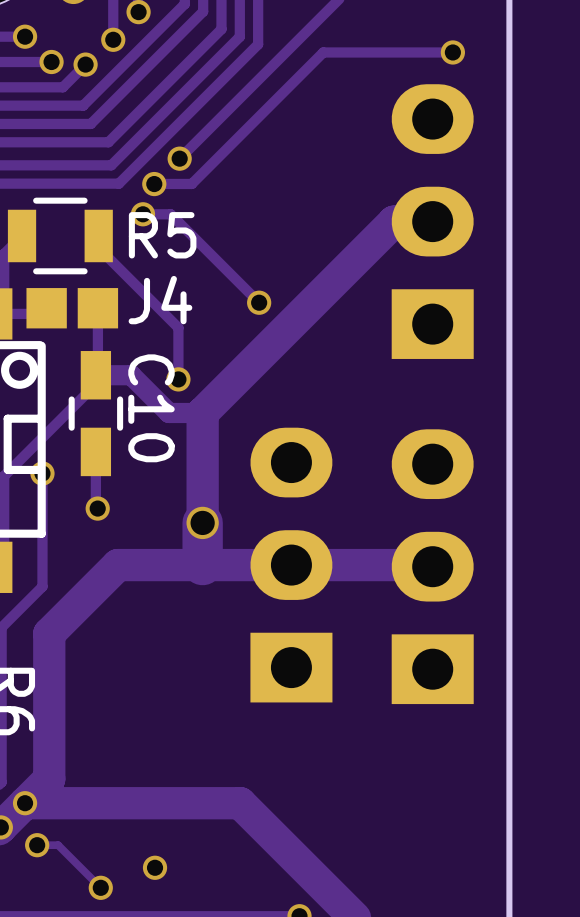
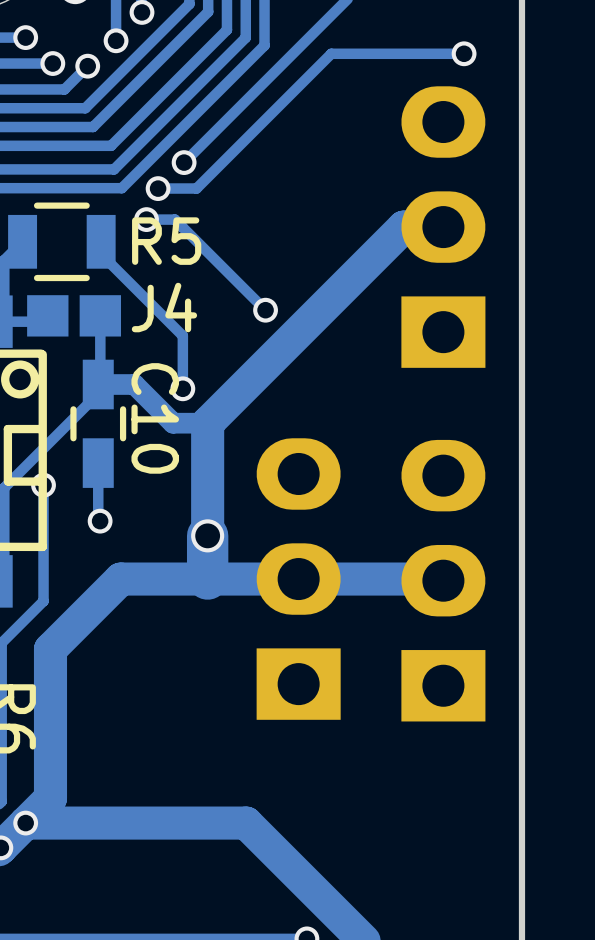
track: (37, 845) (58, 845) (100, 887) -> none
via: (37, 845) -> none
via: (155, 867) -> none
via: (100, 887) -> none

